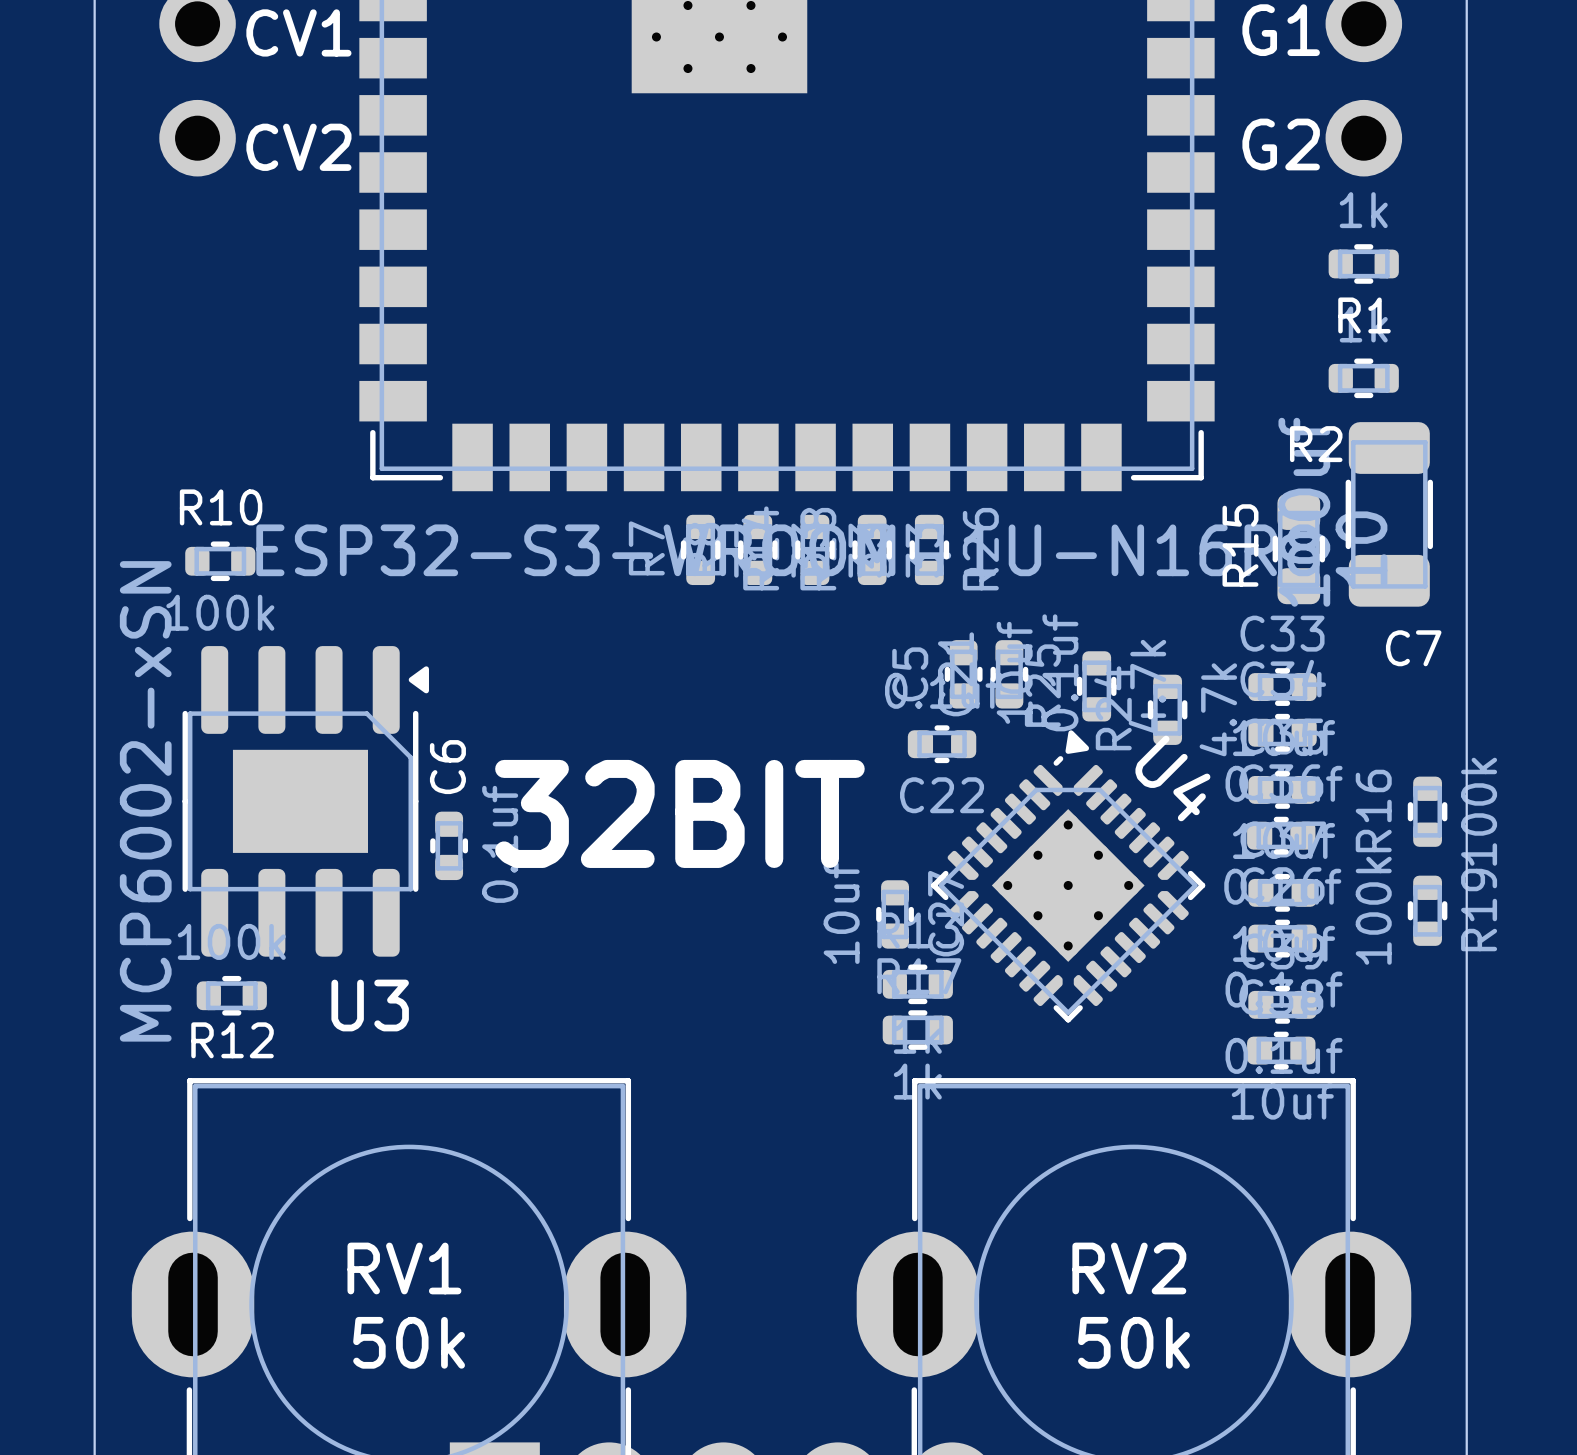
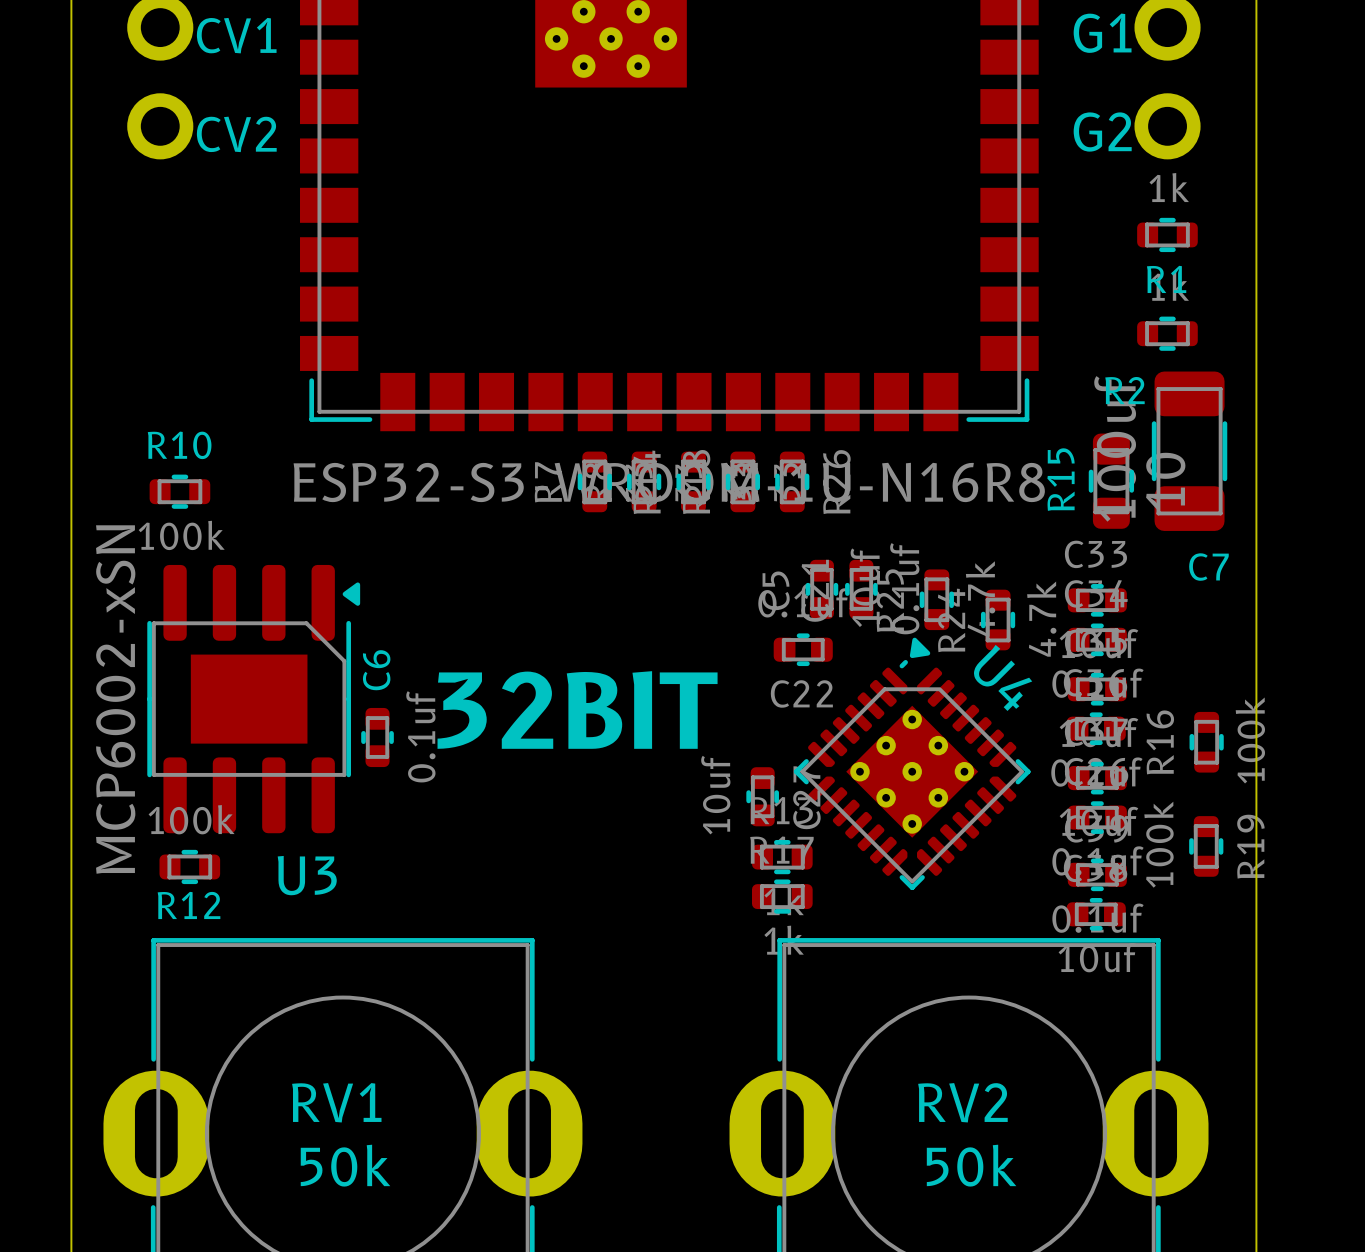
R16 position: (1427, 811) -> (1206, 742)
R19 position: (1427, 910) -> (1206, 846)

